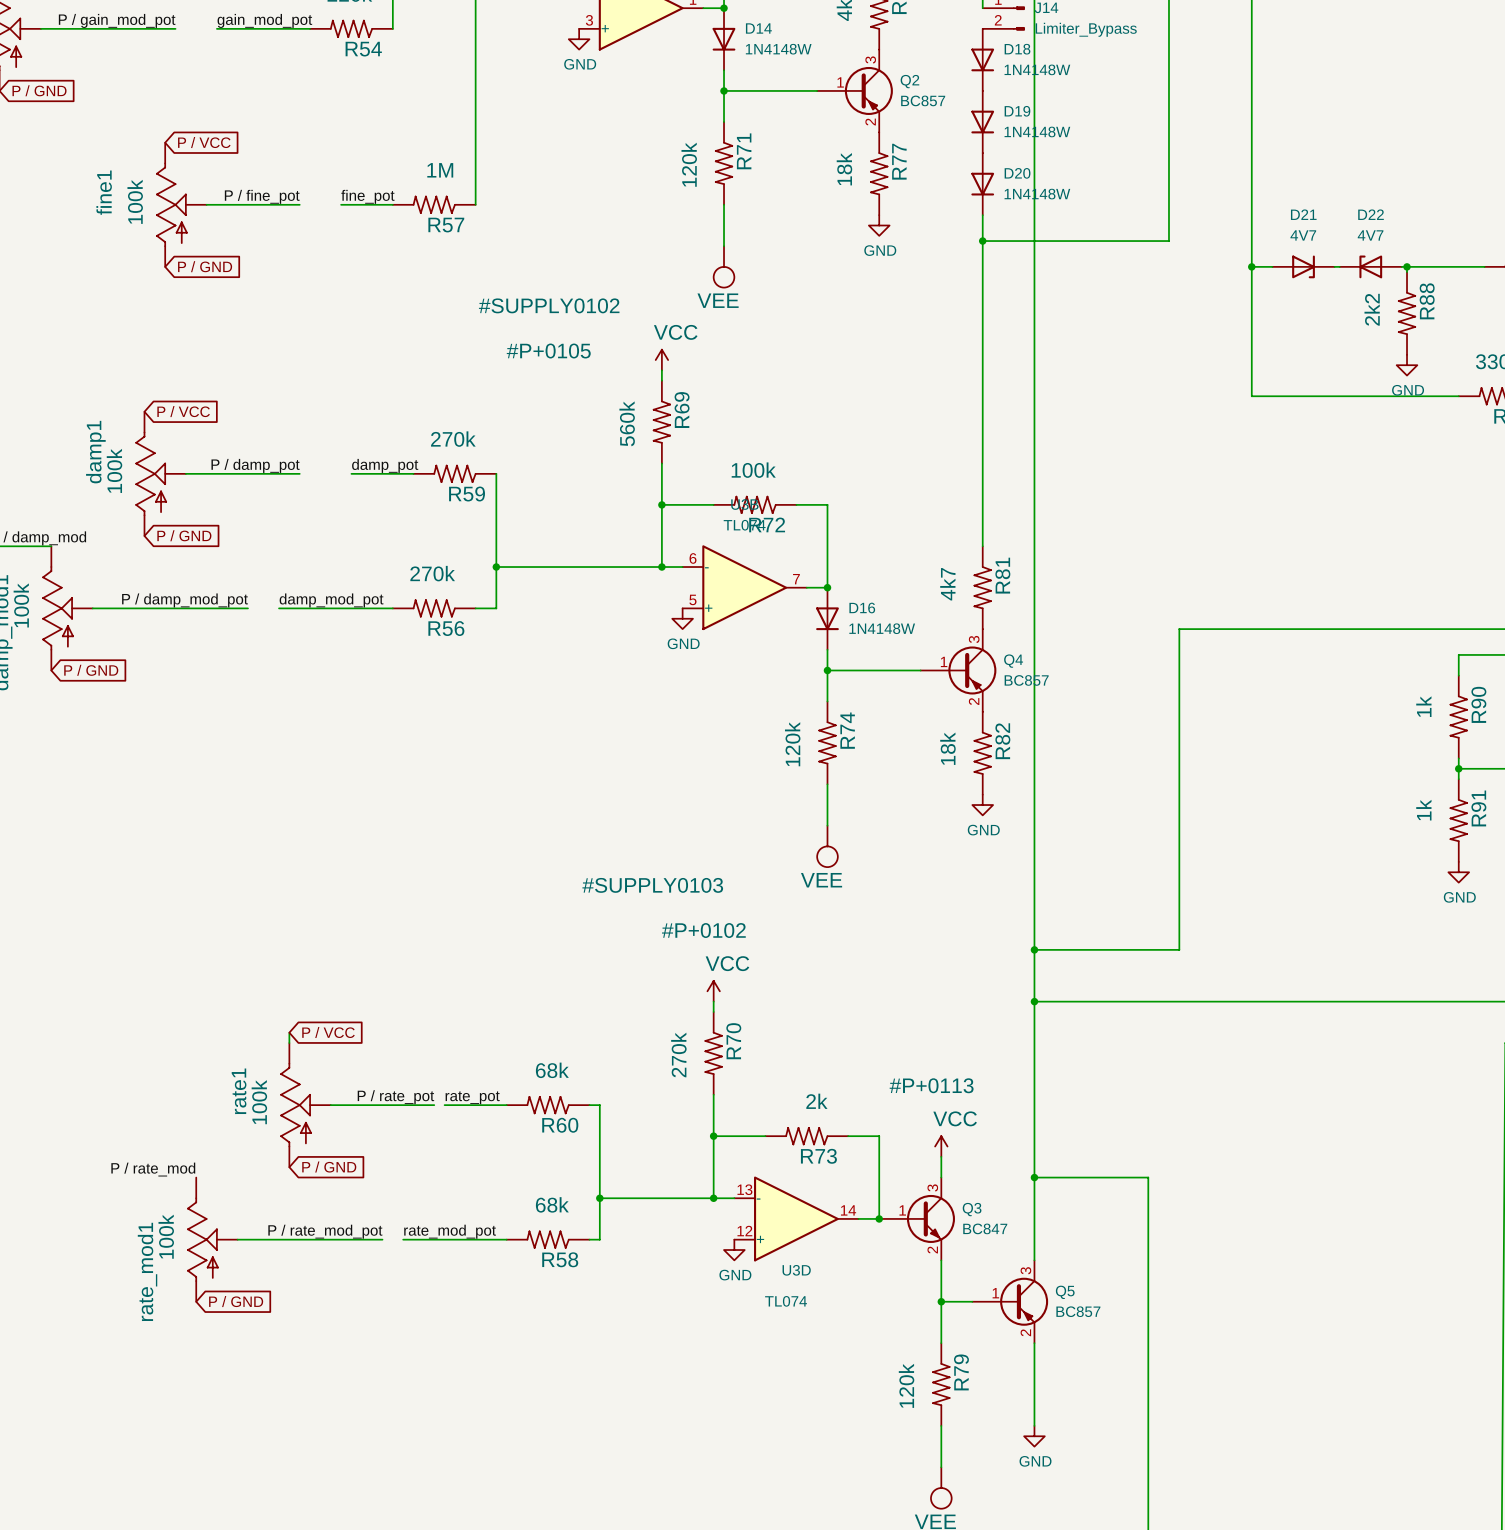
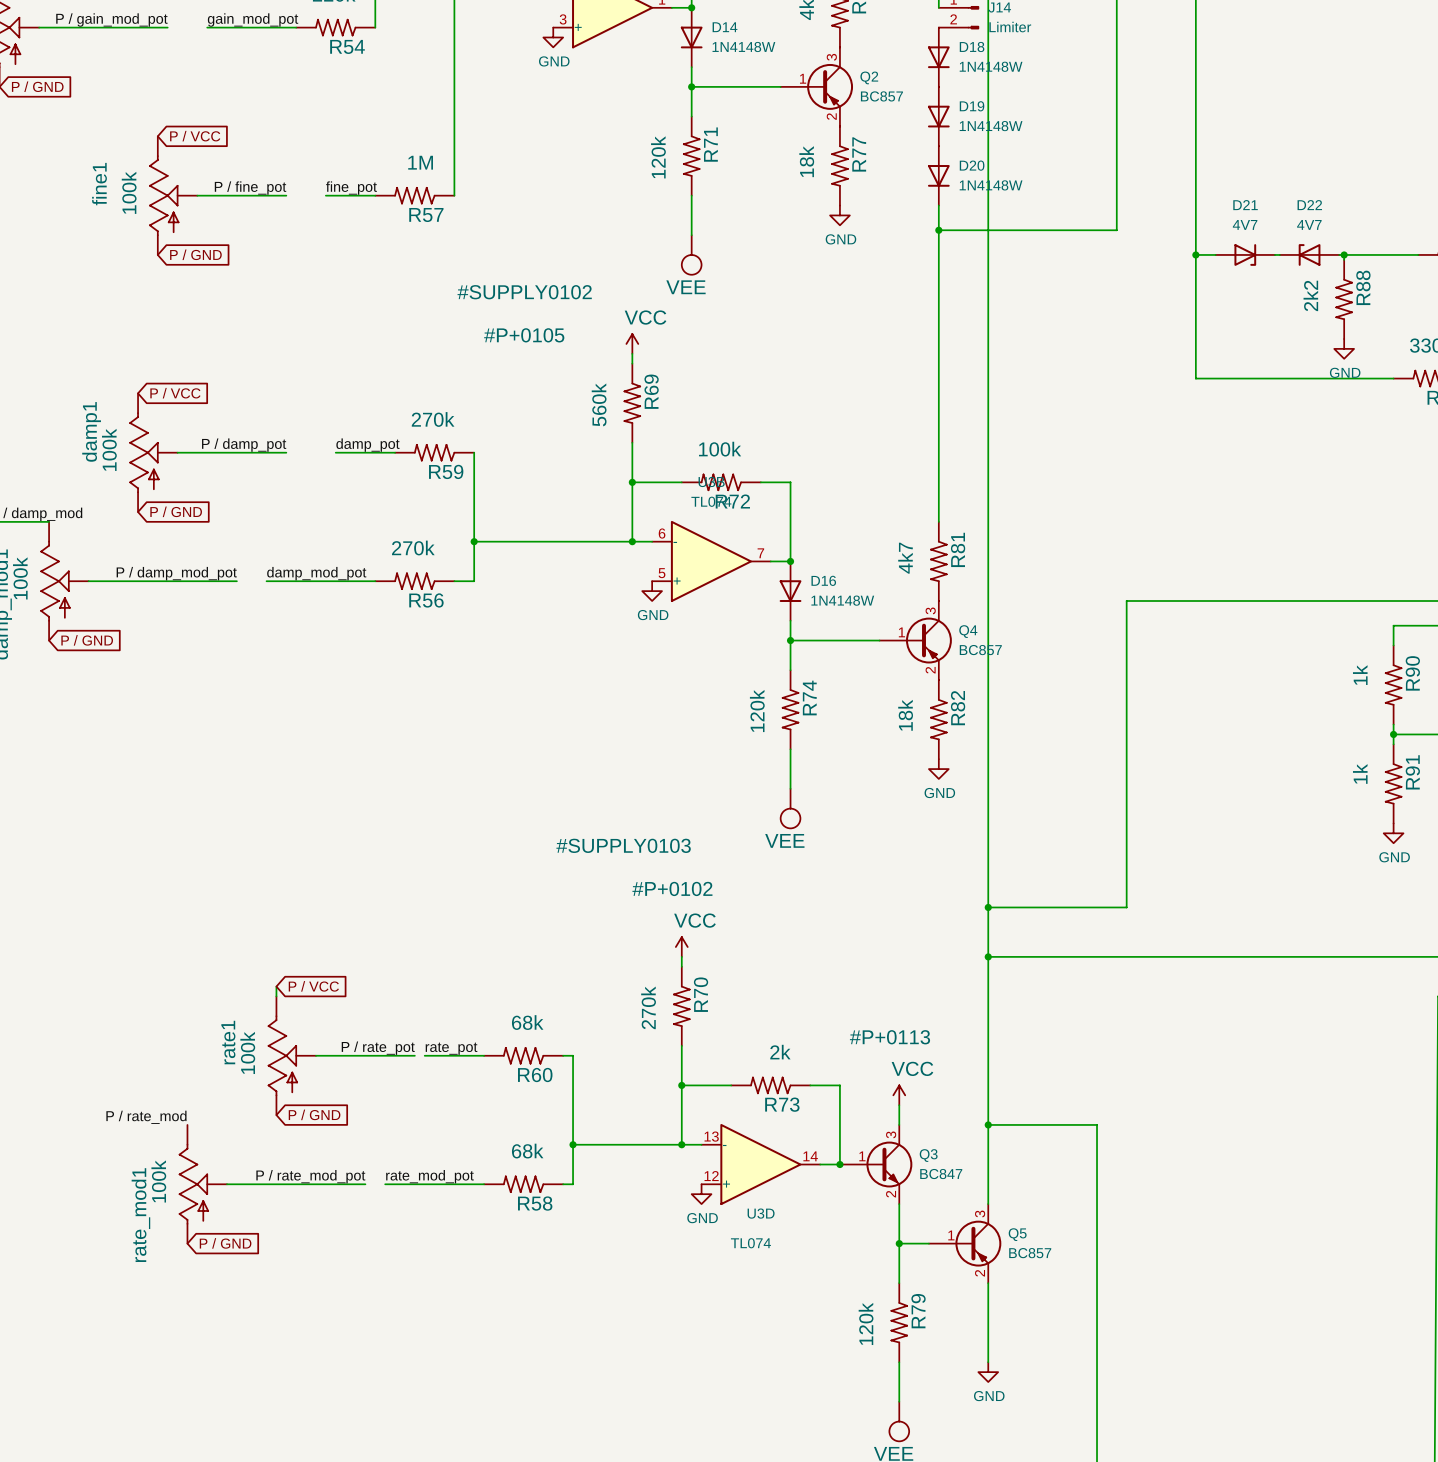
J14 value: Limiter_Bypass (1086, 29) -> Limiter (1010, 27)

